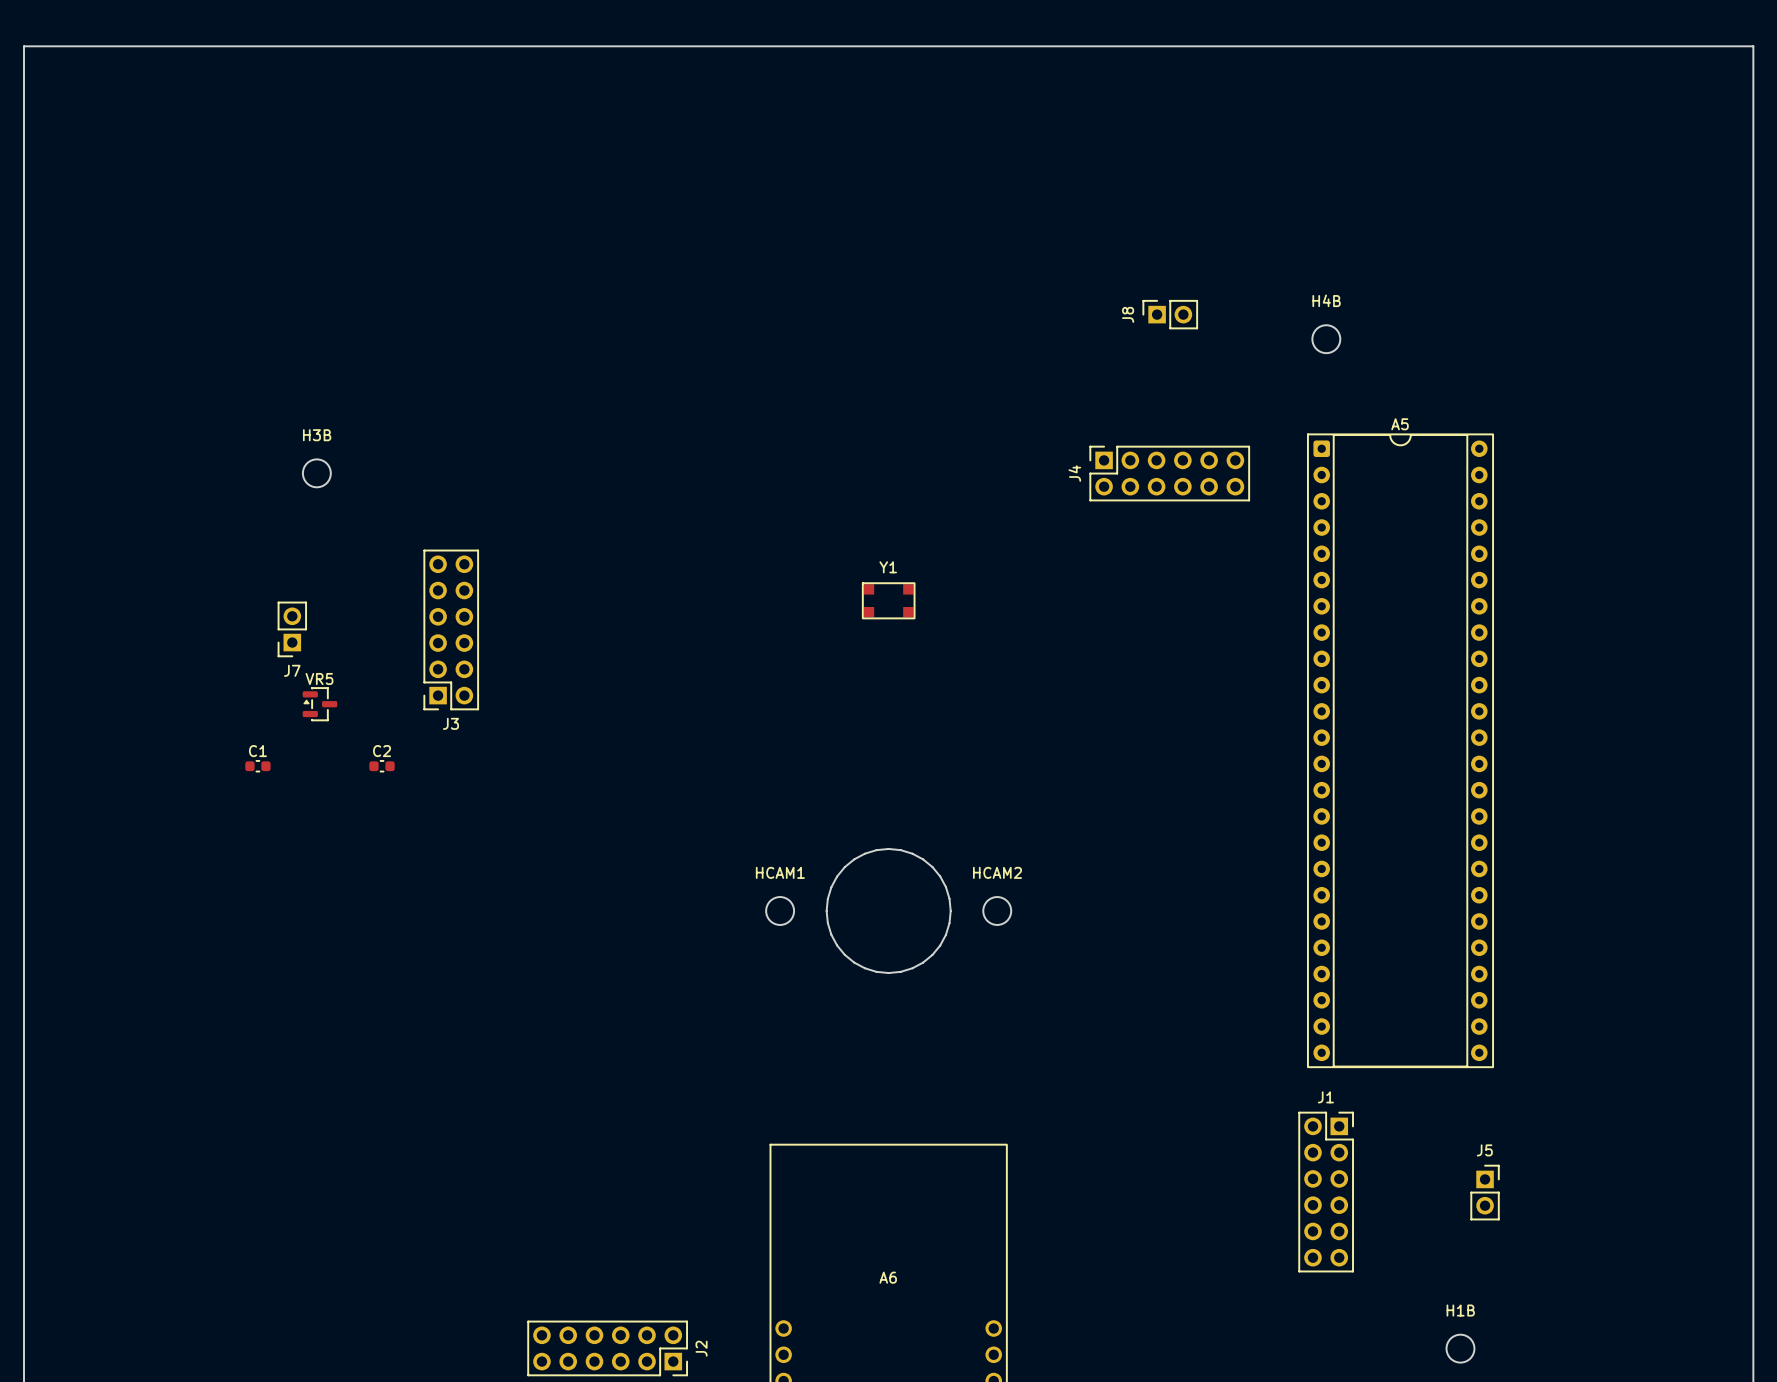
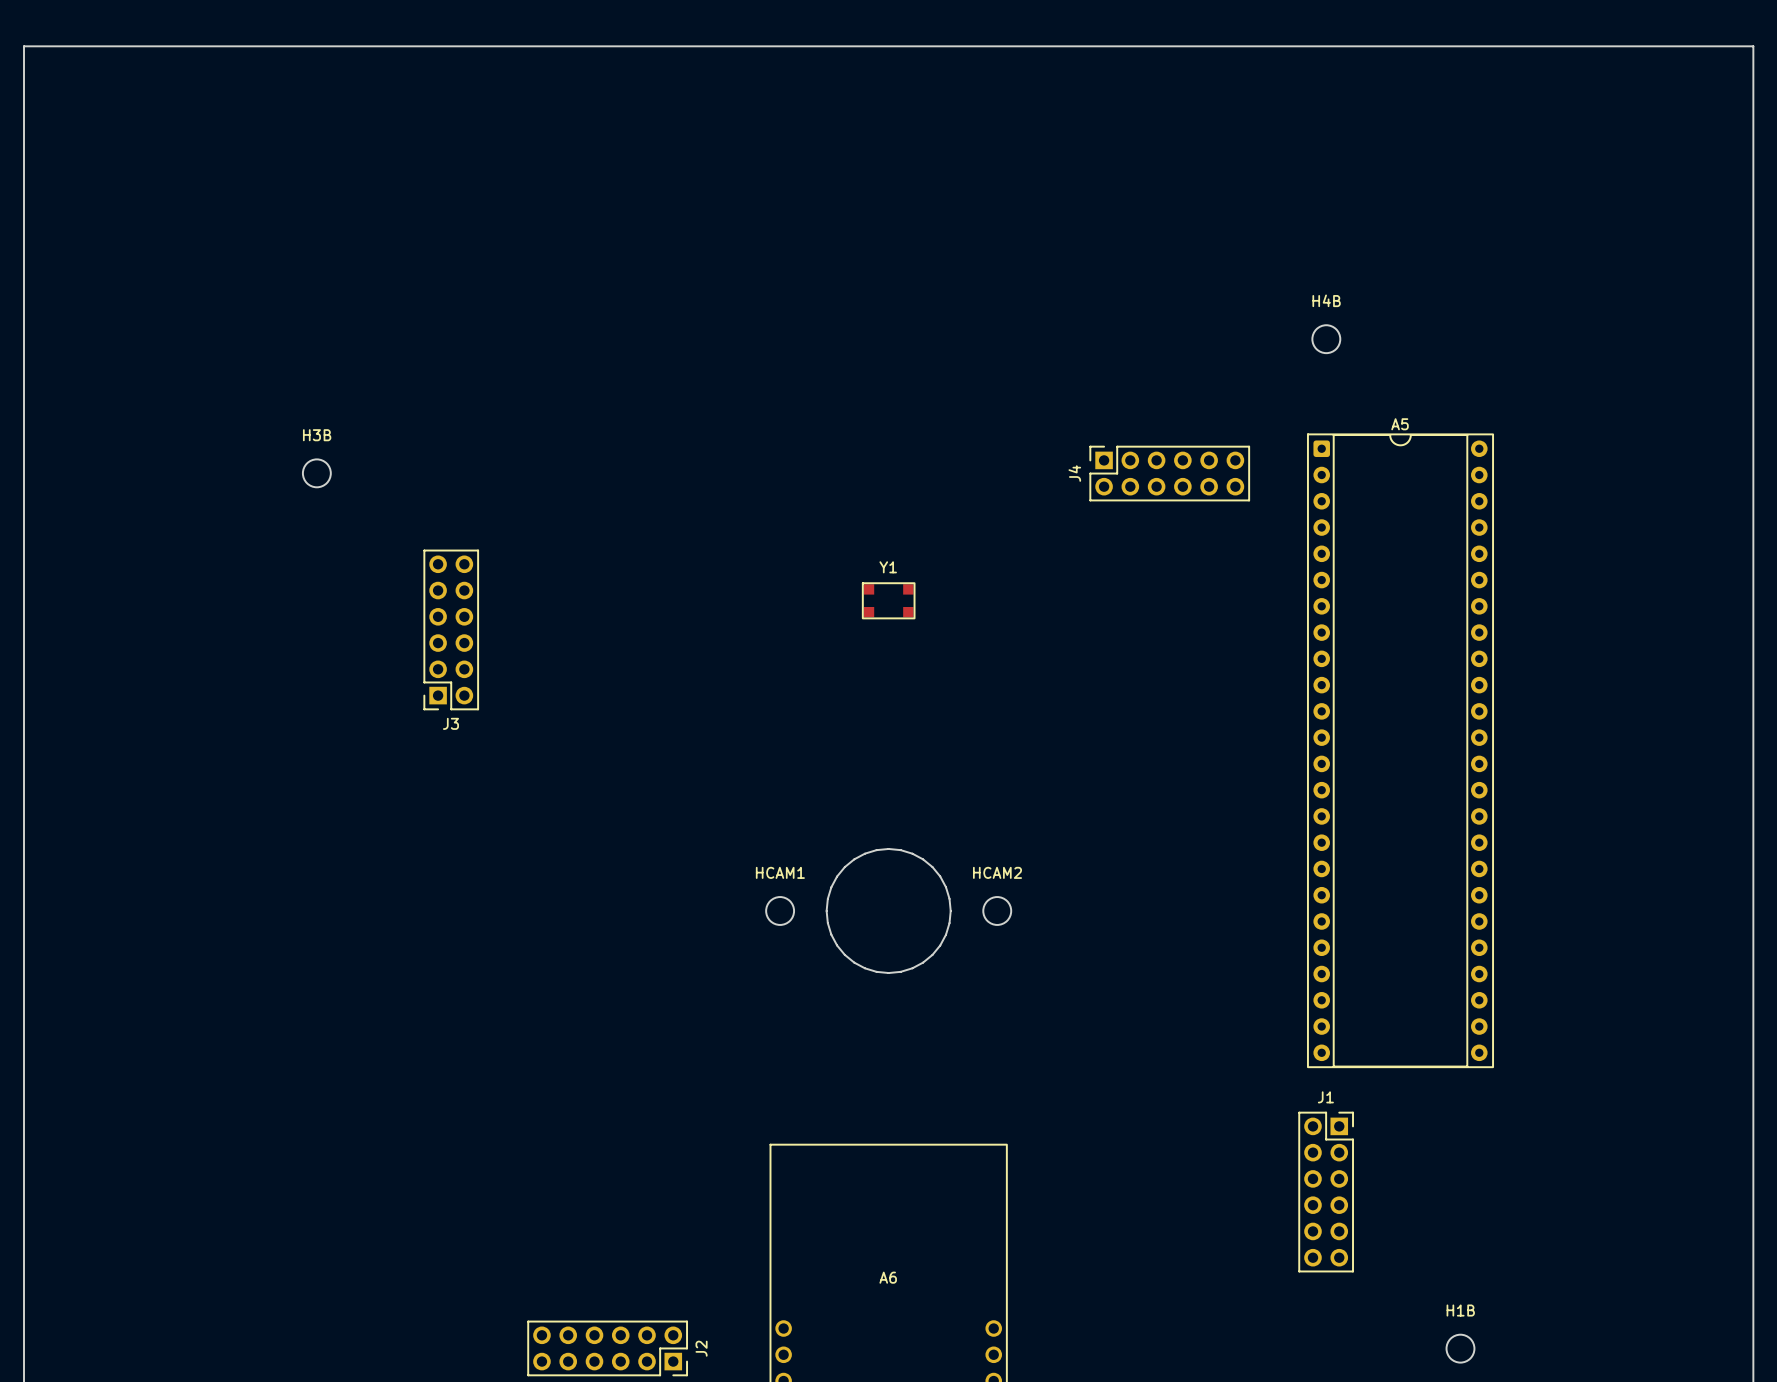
J8: (1170, 314) -> none
J7: (292, 629) -> none
VR5: (319, 704) -> none
C1: (257, 766) -> none
C2: (382, 766) -> none
J5: (1485, 1192) -> none

